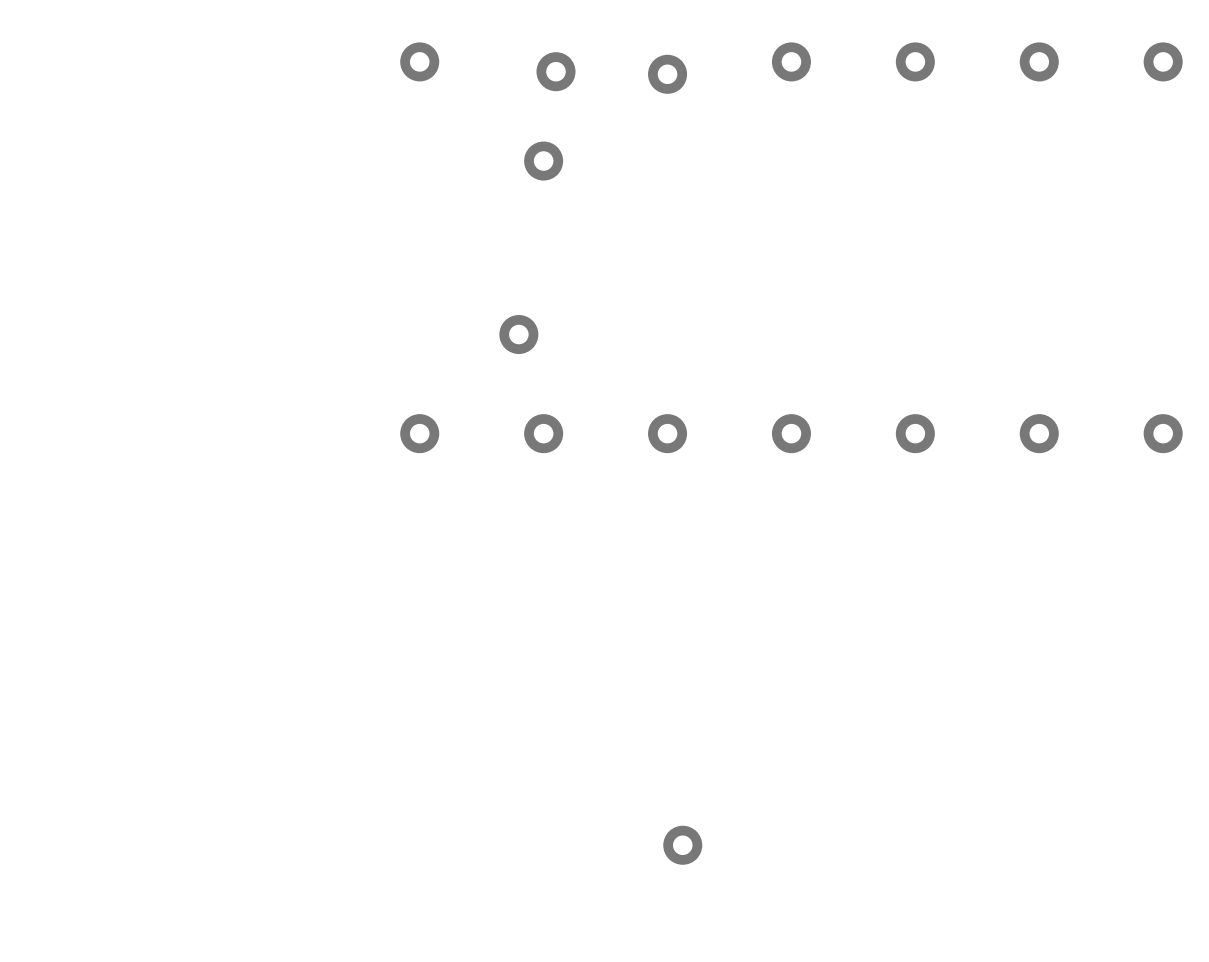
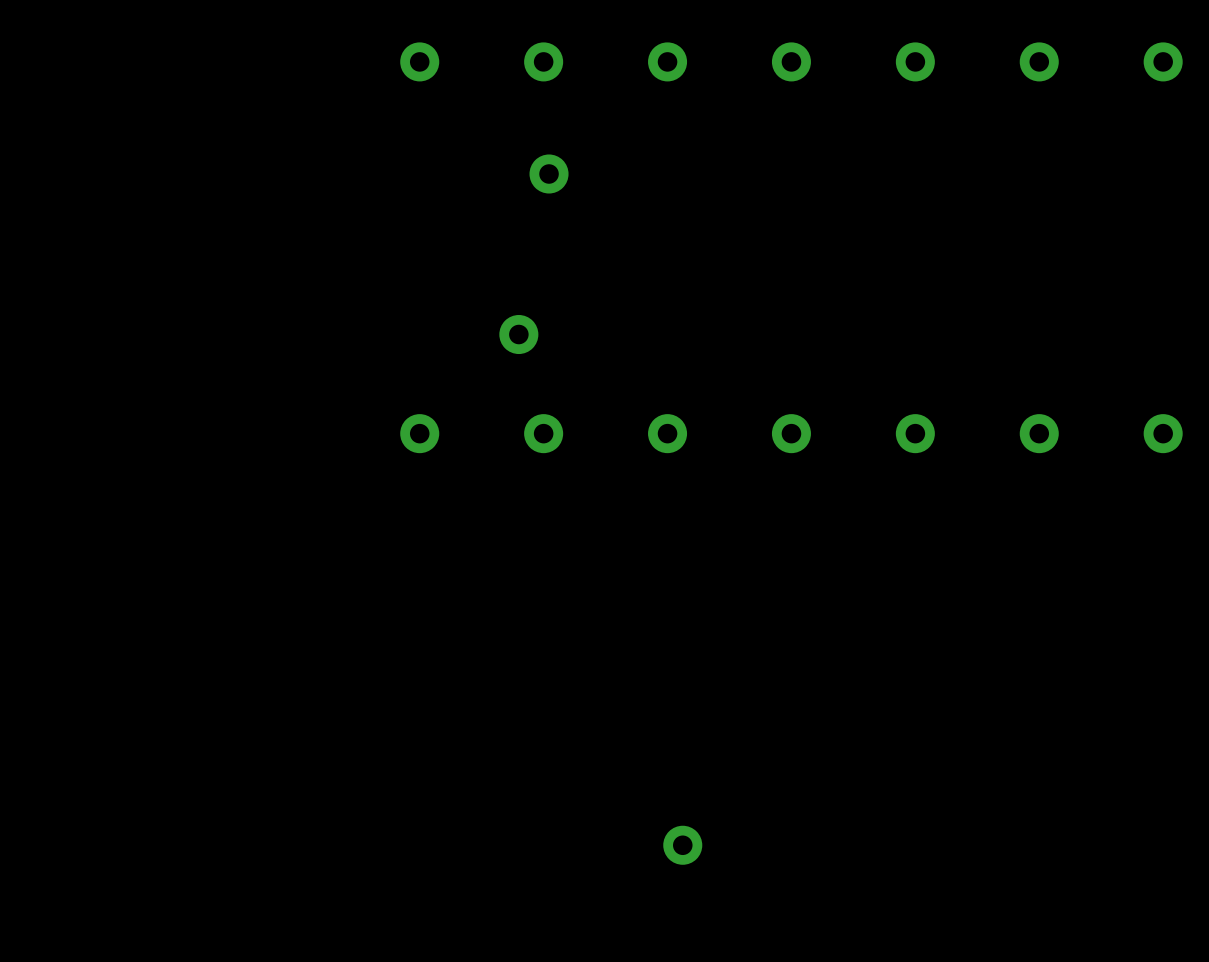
via position: (555, 71) -> (543, 61)
via position: (667, 74) -> (667, 61)
via position: (543, 161) -> (549, 173)

